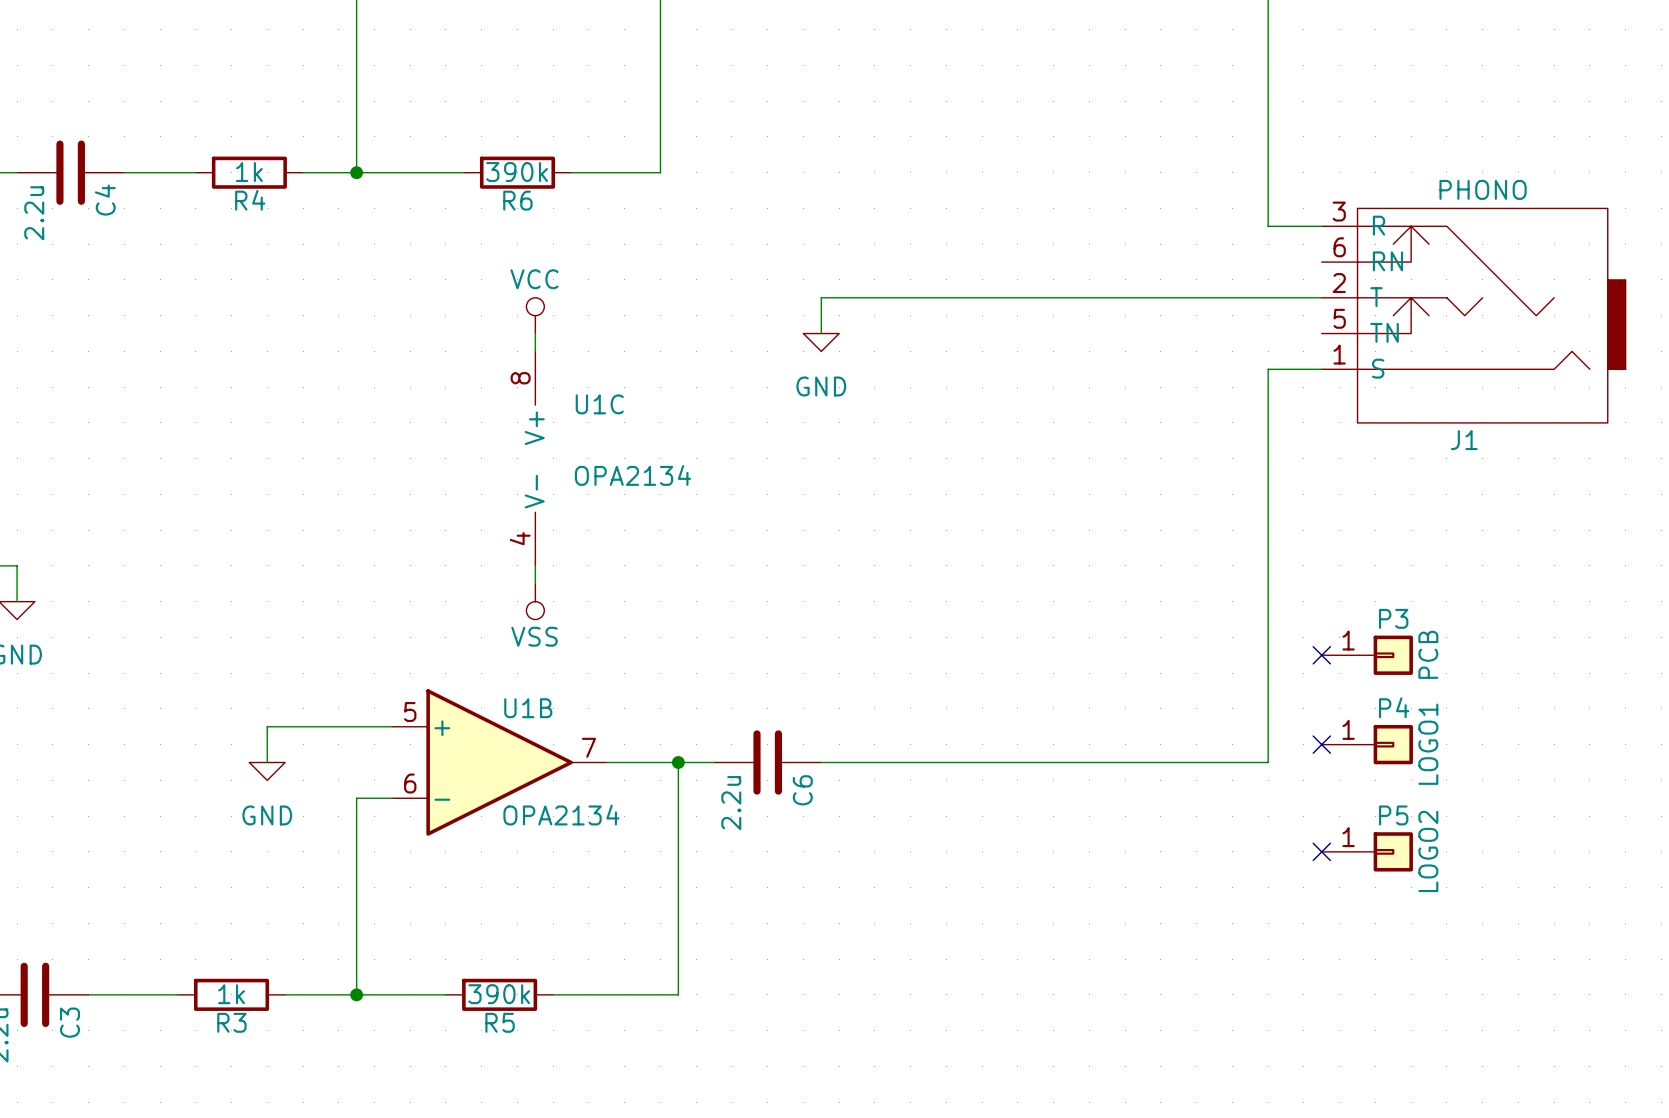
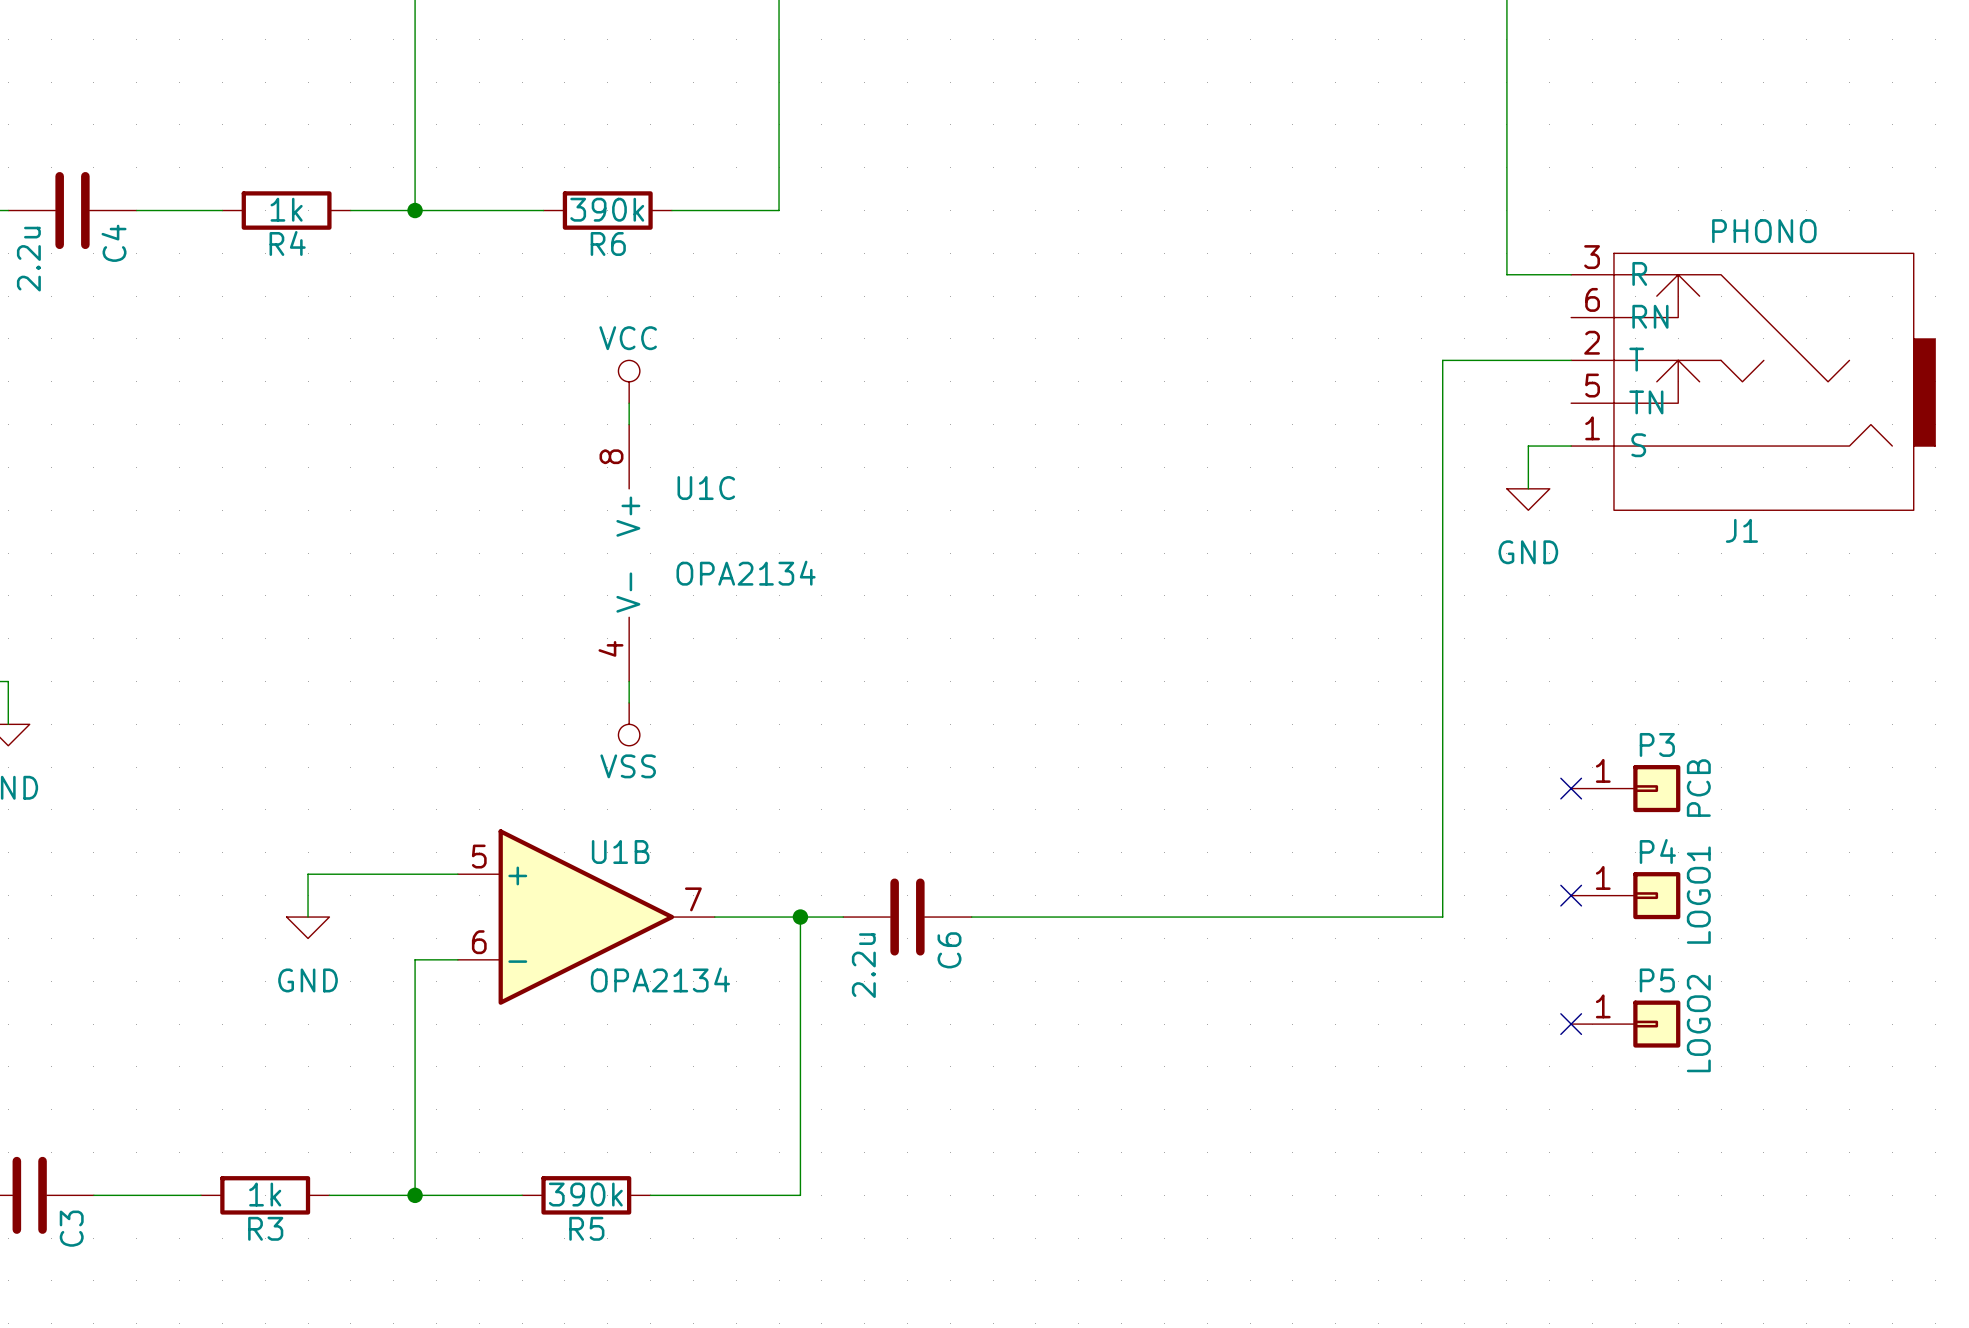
wire: (1214, 297) (821, 297) (821, 333) -> none
power symbol: GND (821, 342) -> none
wire: (1286, 369) (1268, 369) (1268, 762) (1214, 762) -> (1442, 360) (1442, 917)
wire: none -> (1528, 446) (1528, 488)
power symbol: none -> GND (1528, 499)

